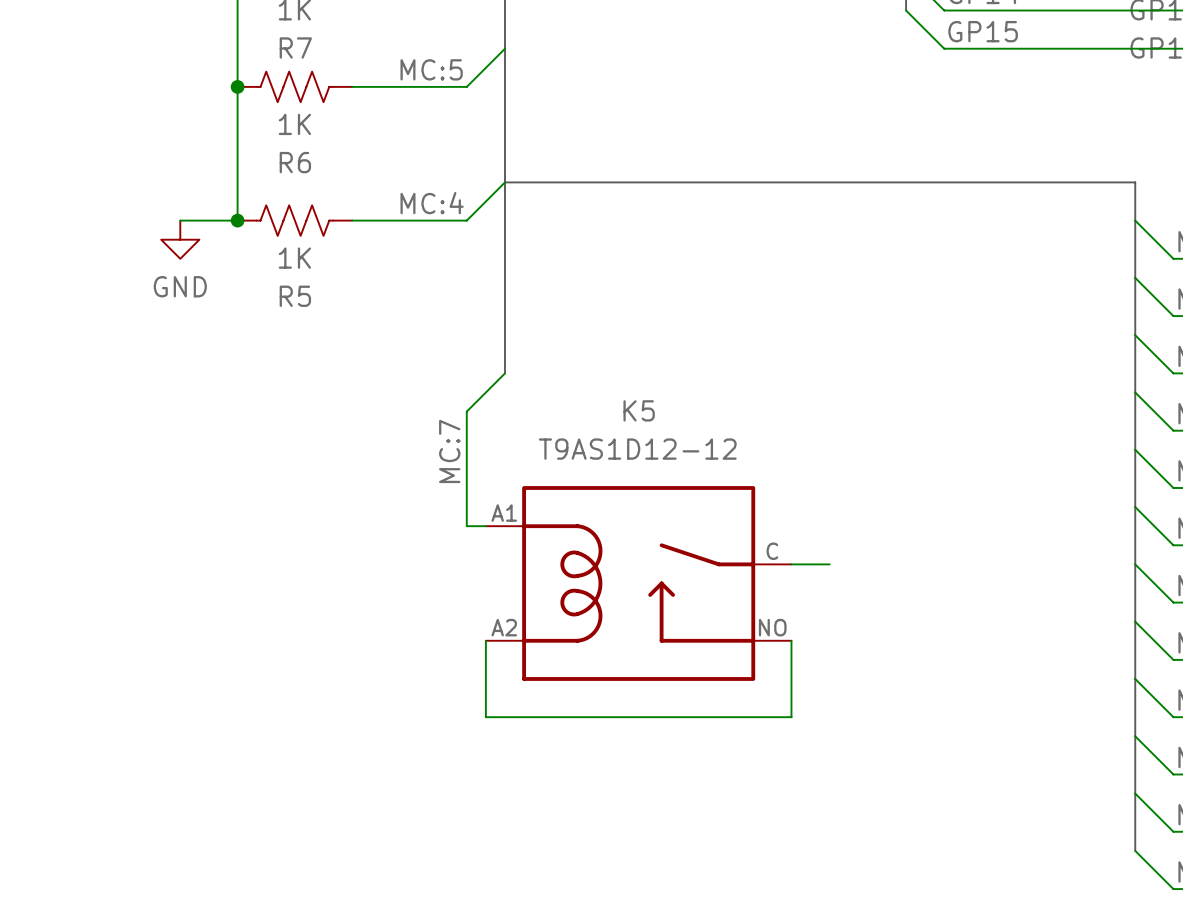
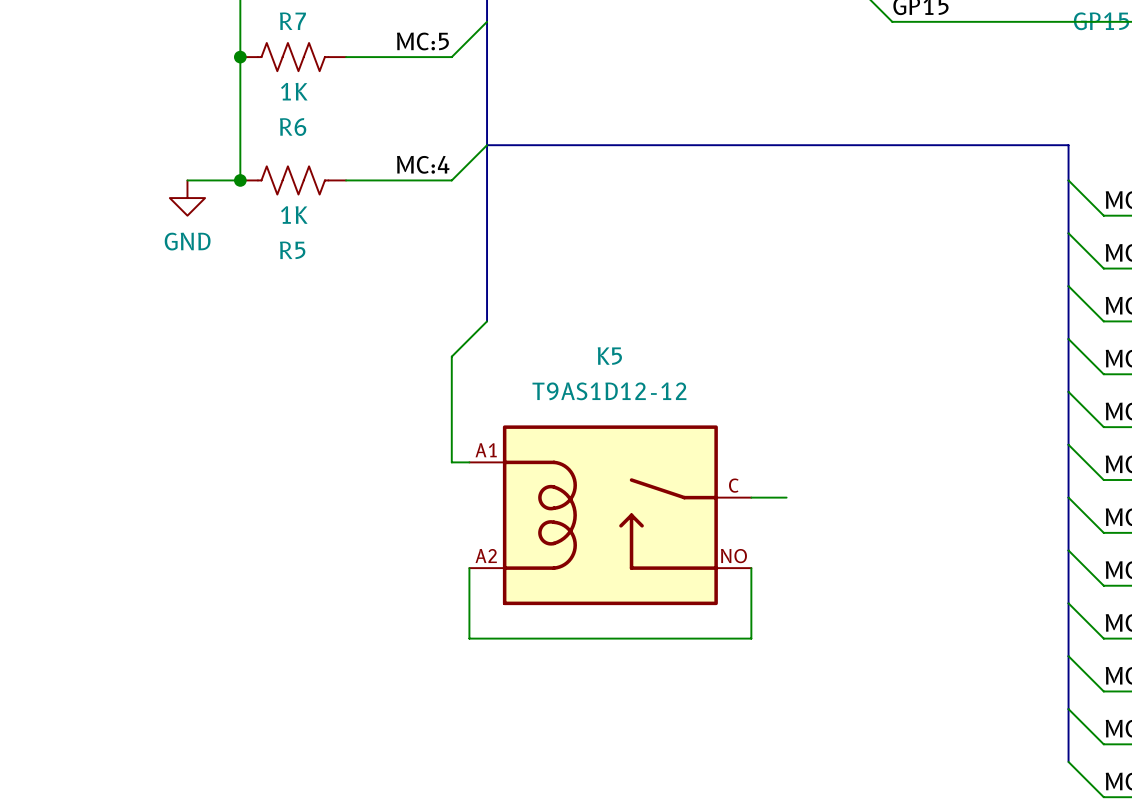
label: MC:7 (449, 451) -> none

